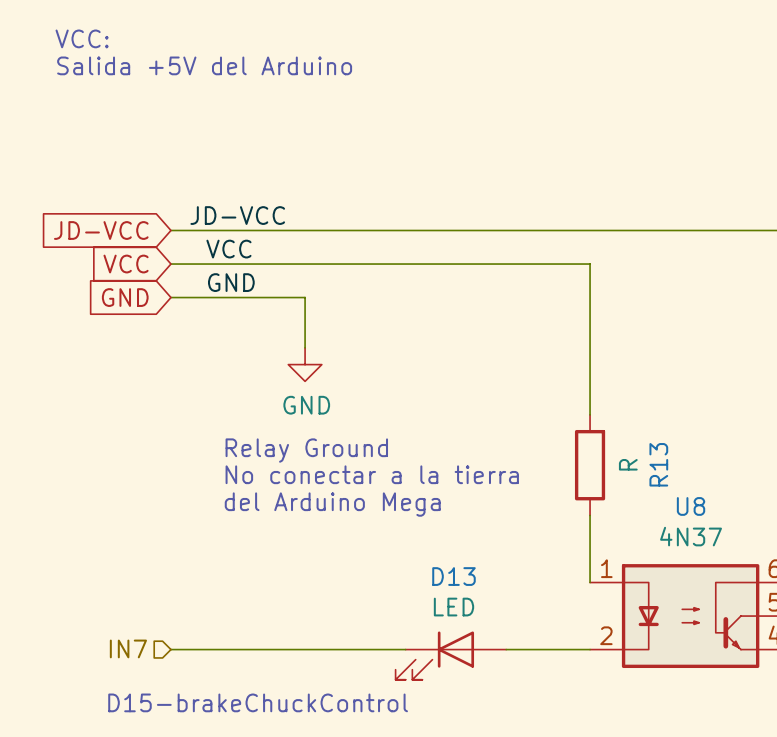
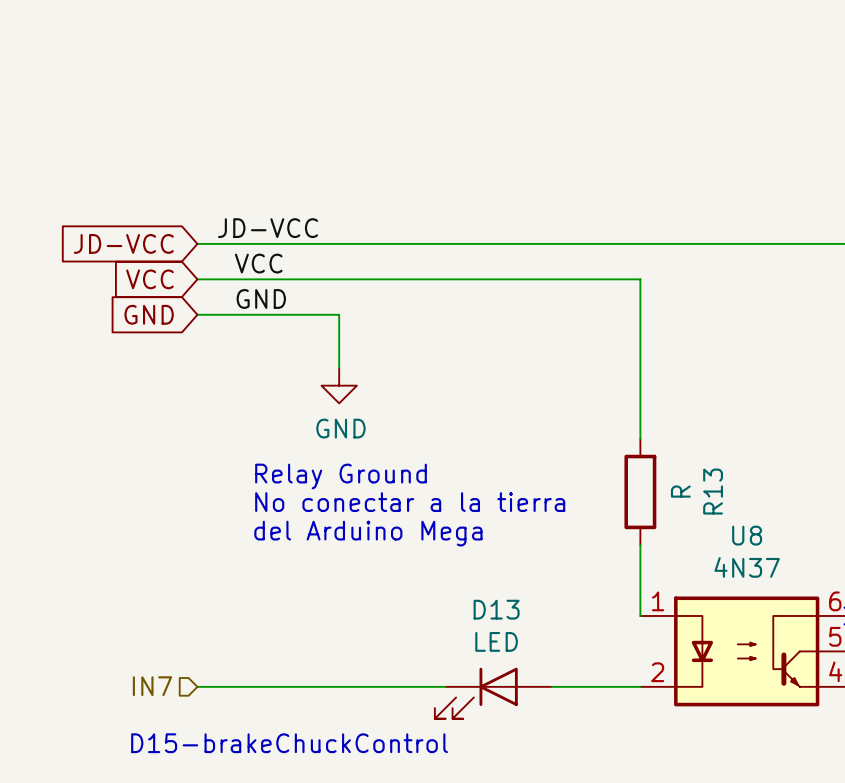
text: VCC: (82, 38) -> none
text: Salida +5V del Arduino (204, 65) -> none

